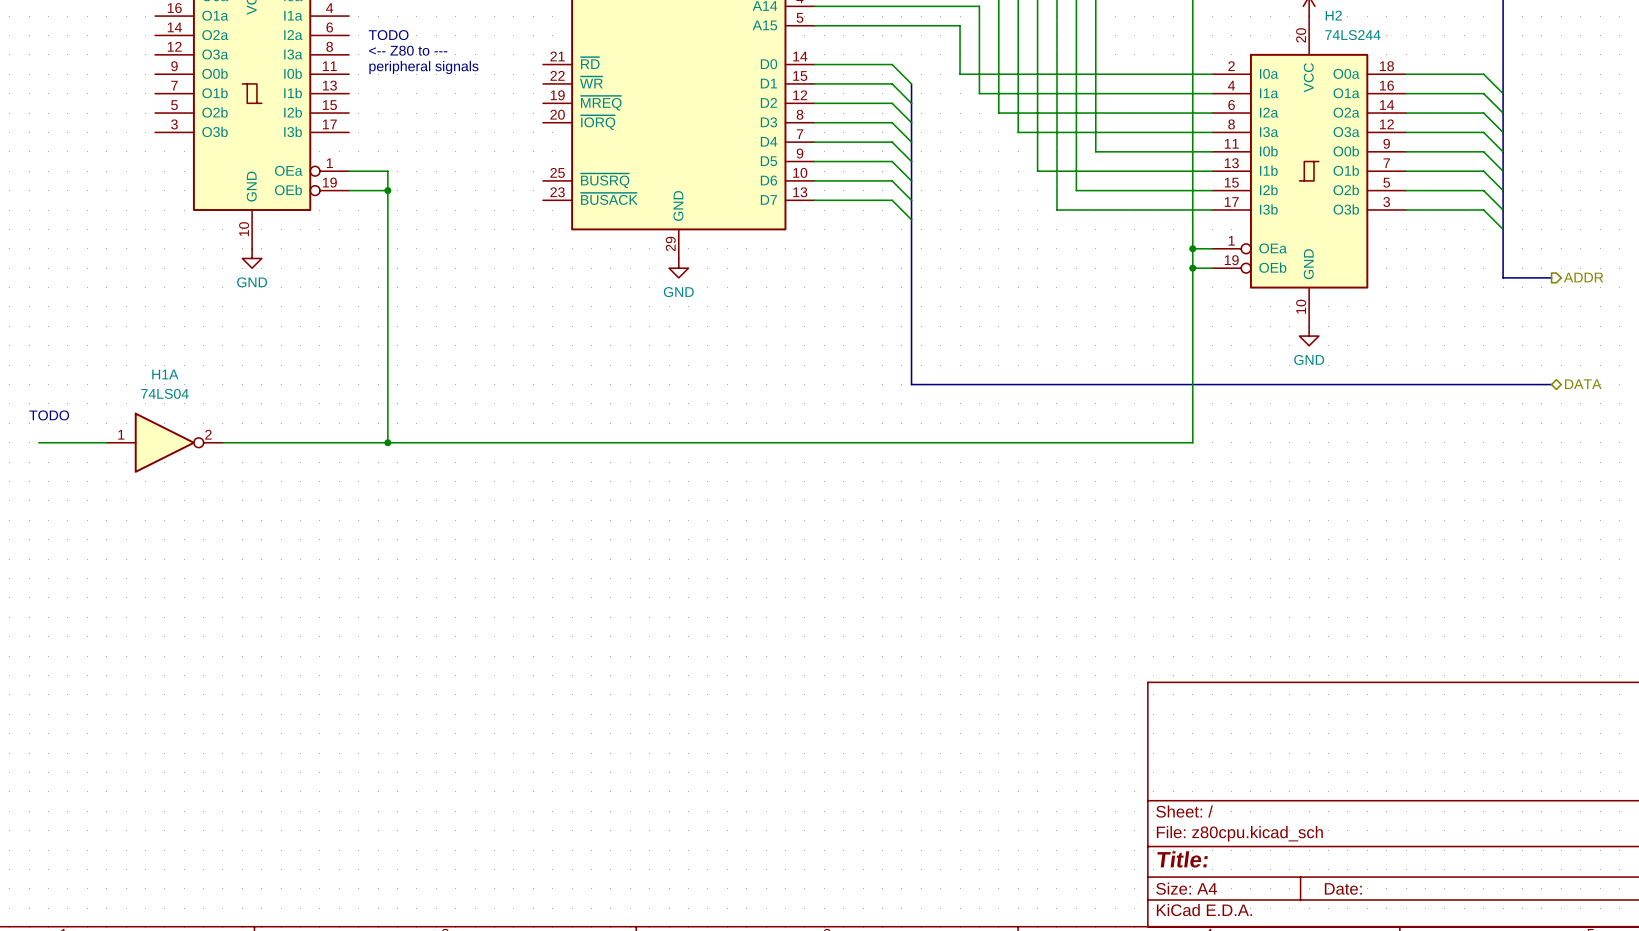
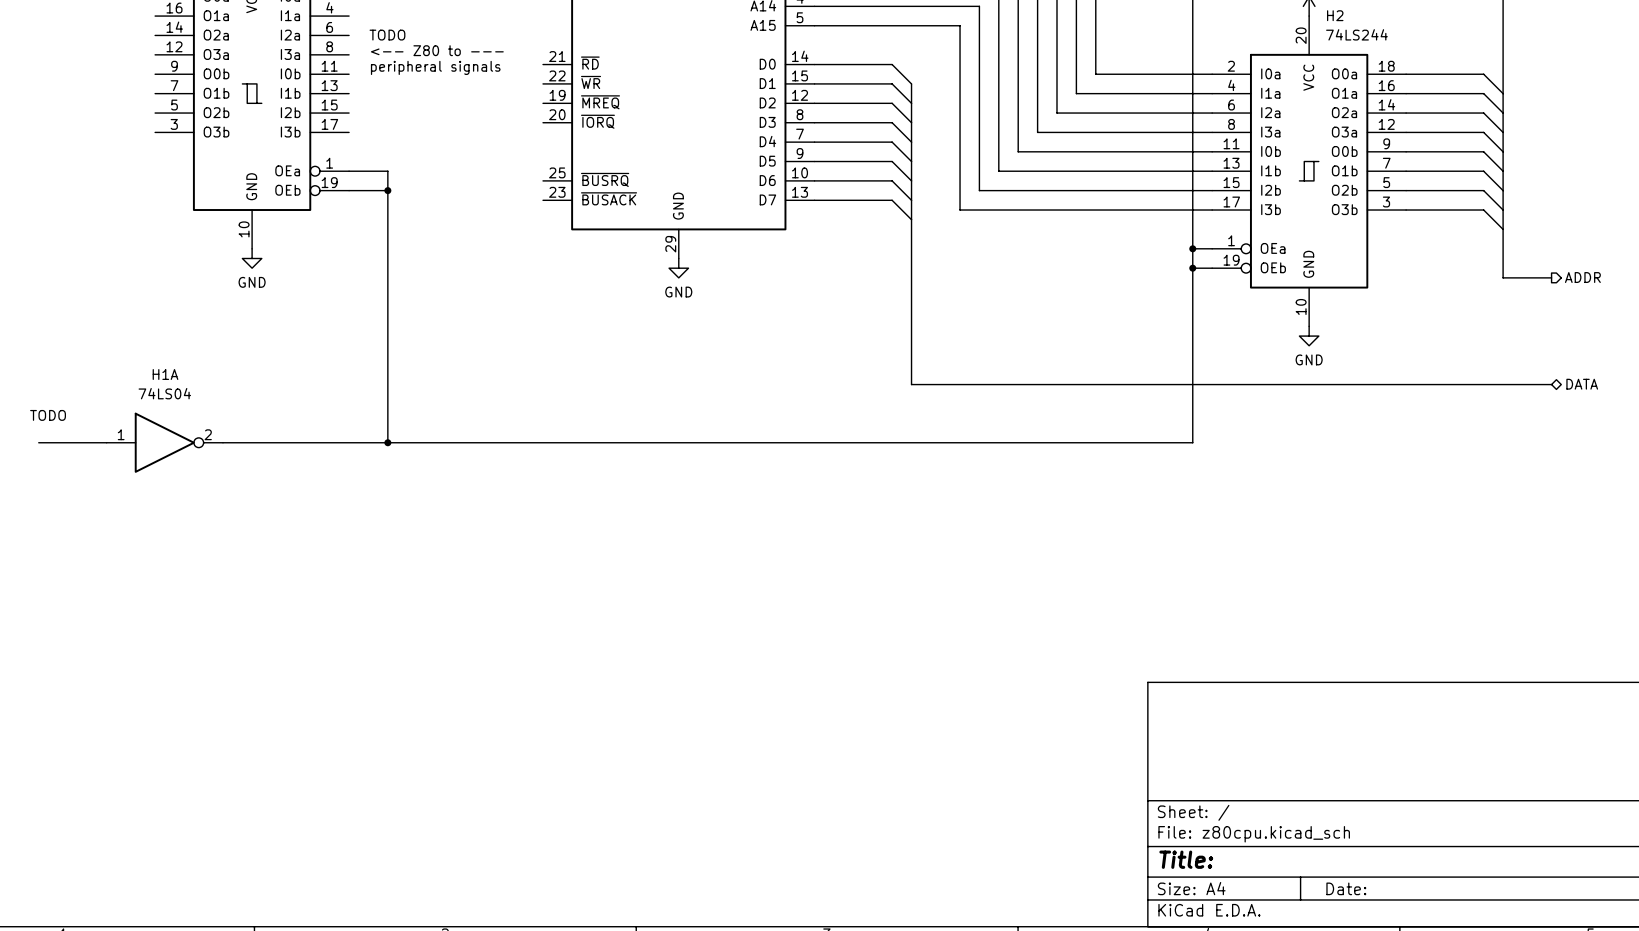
wire: (960, 74) (1095, 74) (1095, 151) -> (1018, 132) (1018, 151) (1095, 151)
wire: (979, 93) (1076, 93) (1076, 190) -> (979, 93) (979, 190) (1076, 190)
wire: (998, 113) (1056, 113) (1056, 210) -> (960, 74) (960, 210) (1056, 210)
wire: (1018, 132) (1037, 132) (1037, 171) -> (998, 113) (998, 171) (1037, 171)

